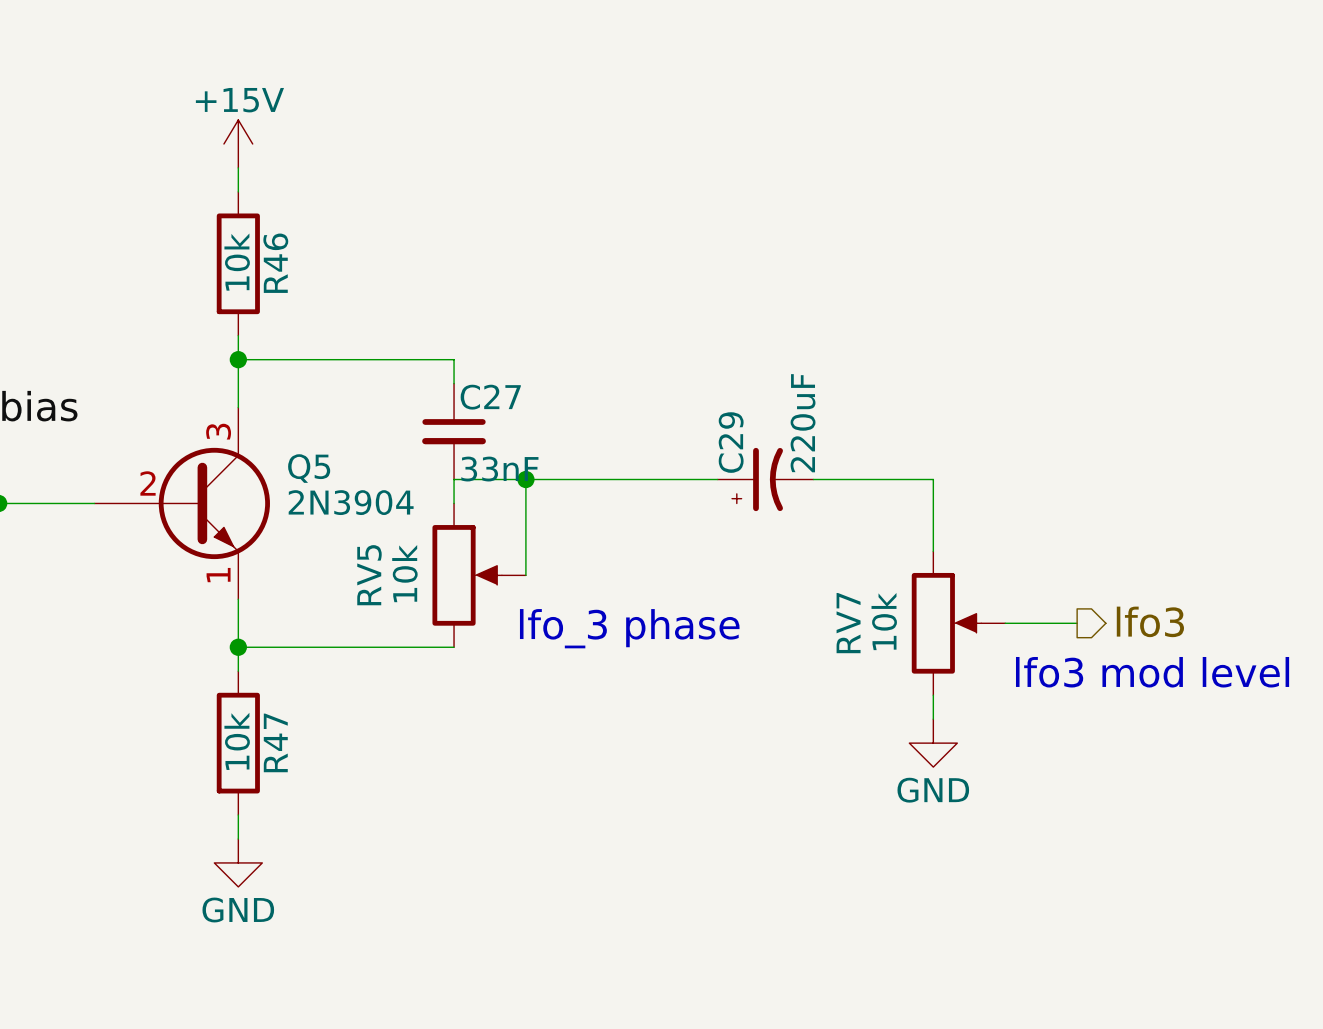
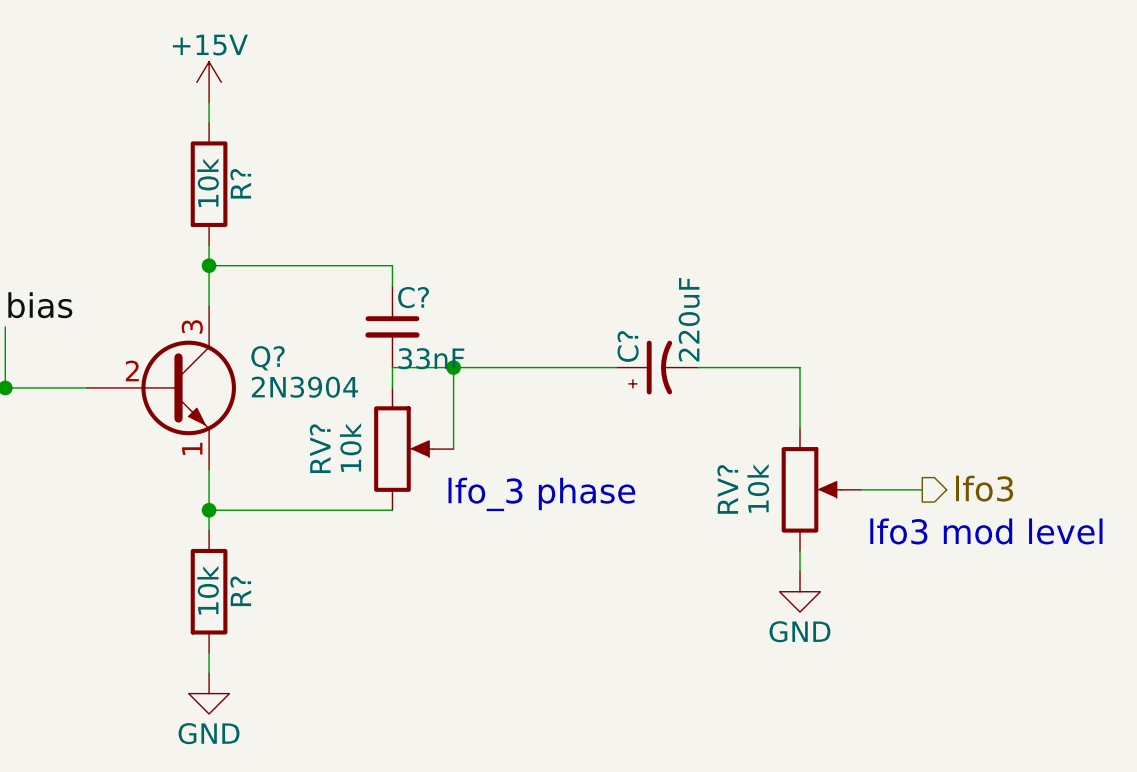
R46 name: R46 (275, 263) -> R? (240, 183)
C27 name: C27 (490, 397) -> C? (413, 297)
C29 name: C29 (731, 442) -> C? (628, 346)
Q5 name: Q5 (309, 468) -> Q? (268, 358)
RV5 name: RV5 (369, 575) -> RV? (320, 448)
RV7 name: RV7 (848, 623) -> RV? (727, 489)
R47 name: R47 (275, 742) -> R? (240, 591)

